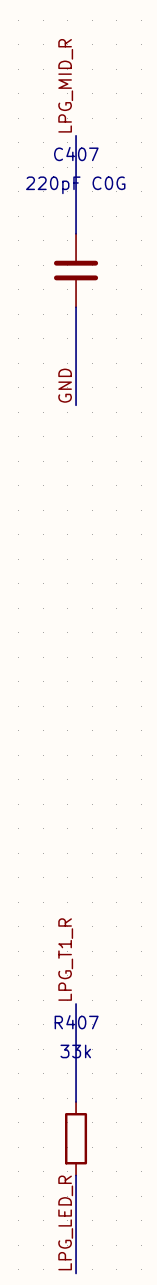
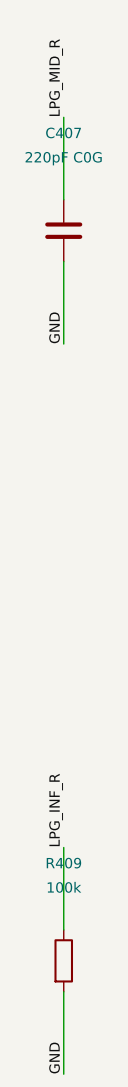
label: LPG_T1_R (65, 959) -> LPG_INF_R (56, 809)
R407 name: R407 (76, 1022) -> R409 (63, 863)
R407 value: 33k (75, 1051) -> 100k (64, 887)
label: LPG_LED_R (65, 1222) -> GND (54, 1058)

